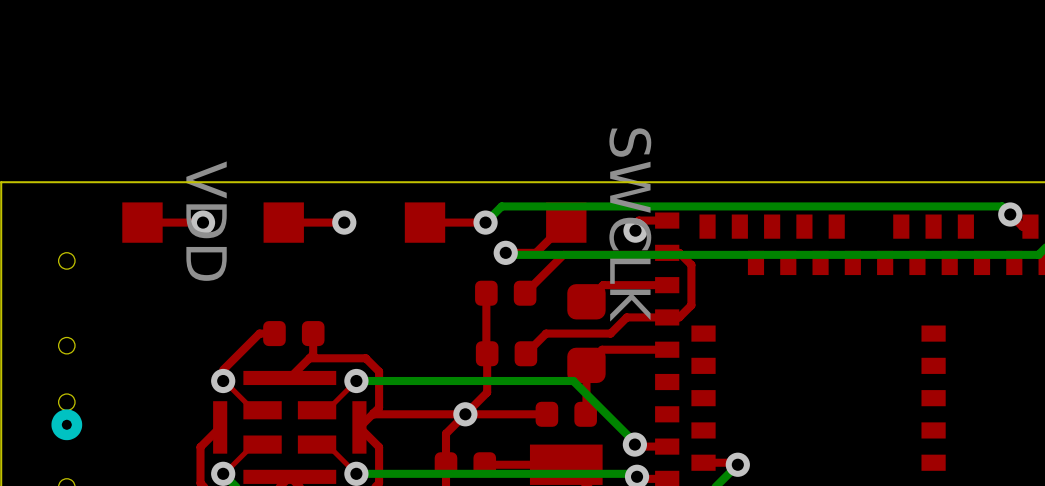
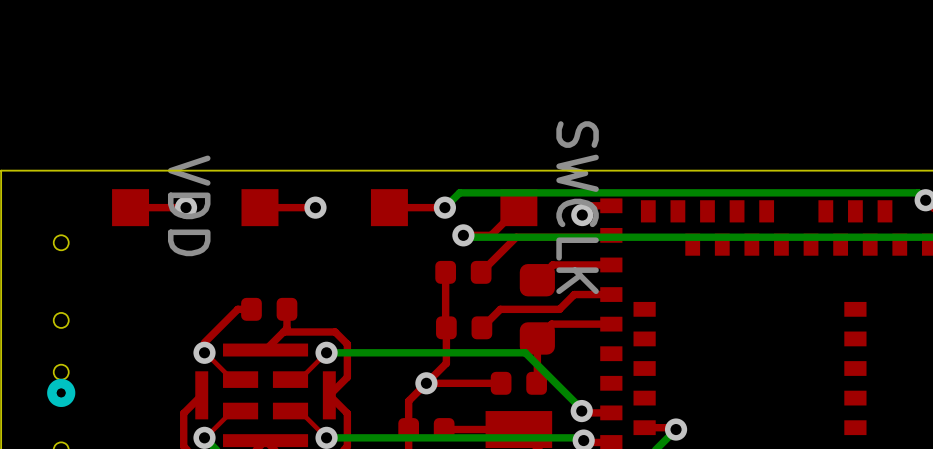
top track: (667, 252) (679, 252) (691, 264) (691, 305) (679, 317) (667, 317) -> none
top track: (373, 413) (465, 414) -> none

